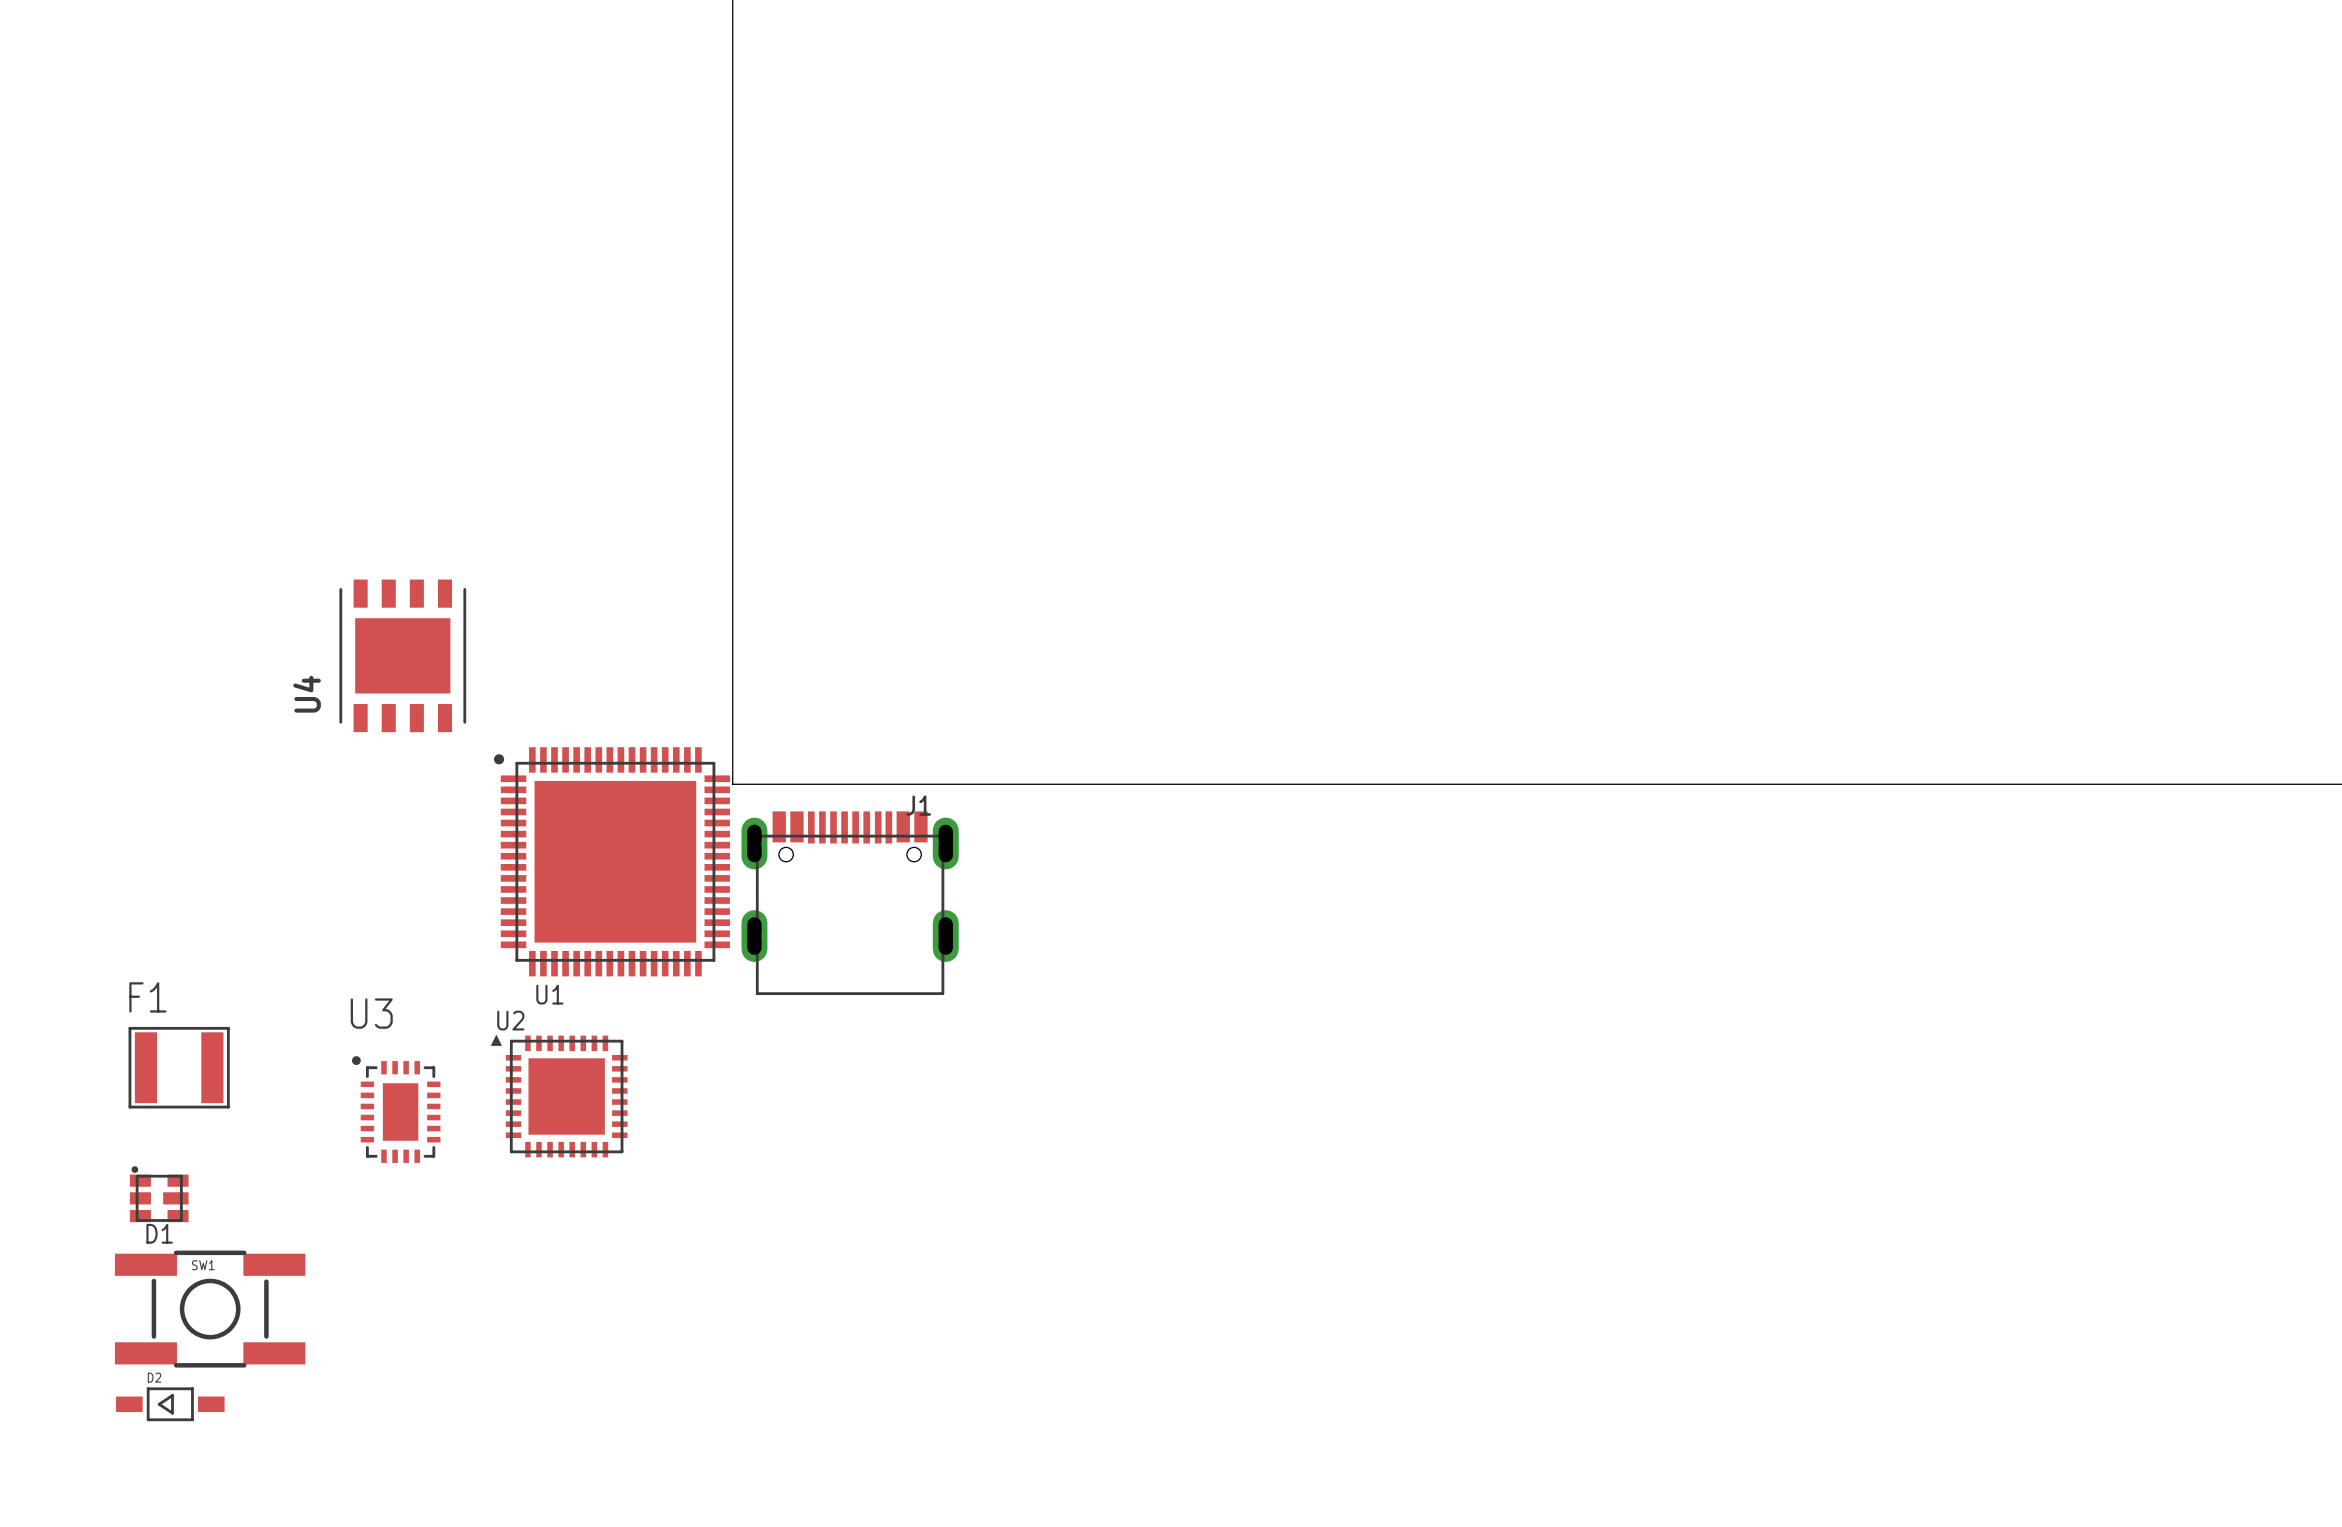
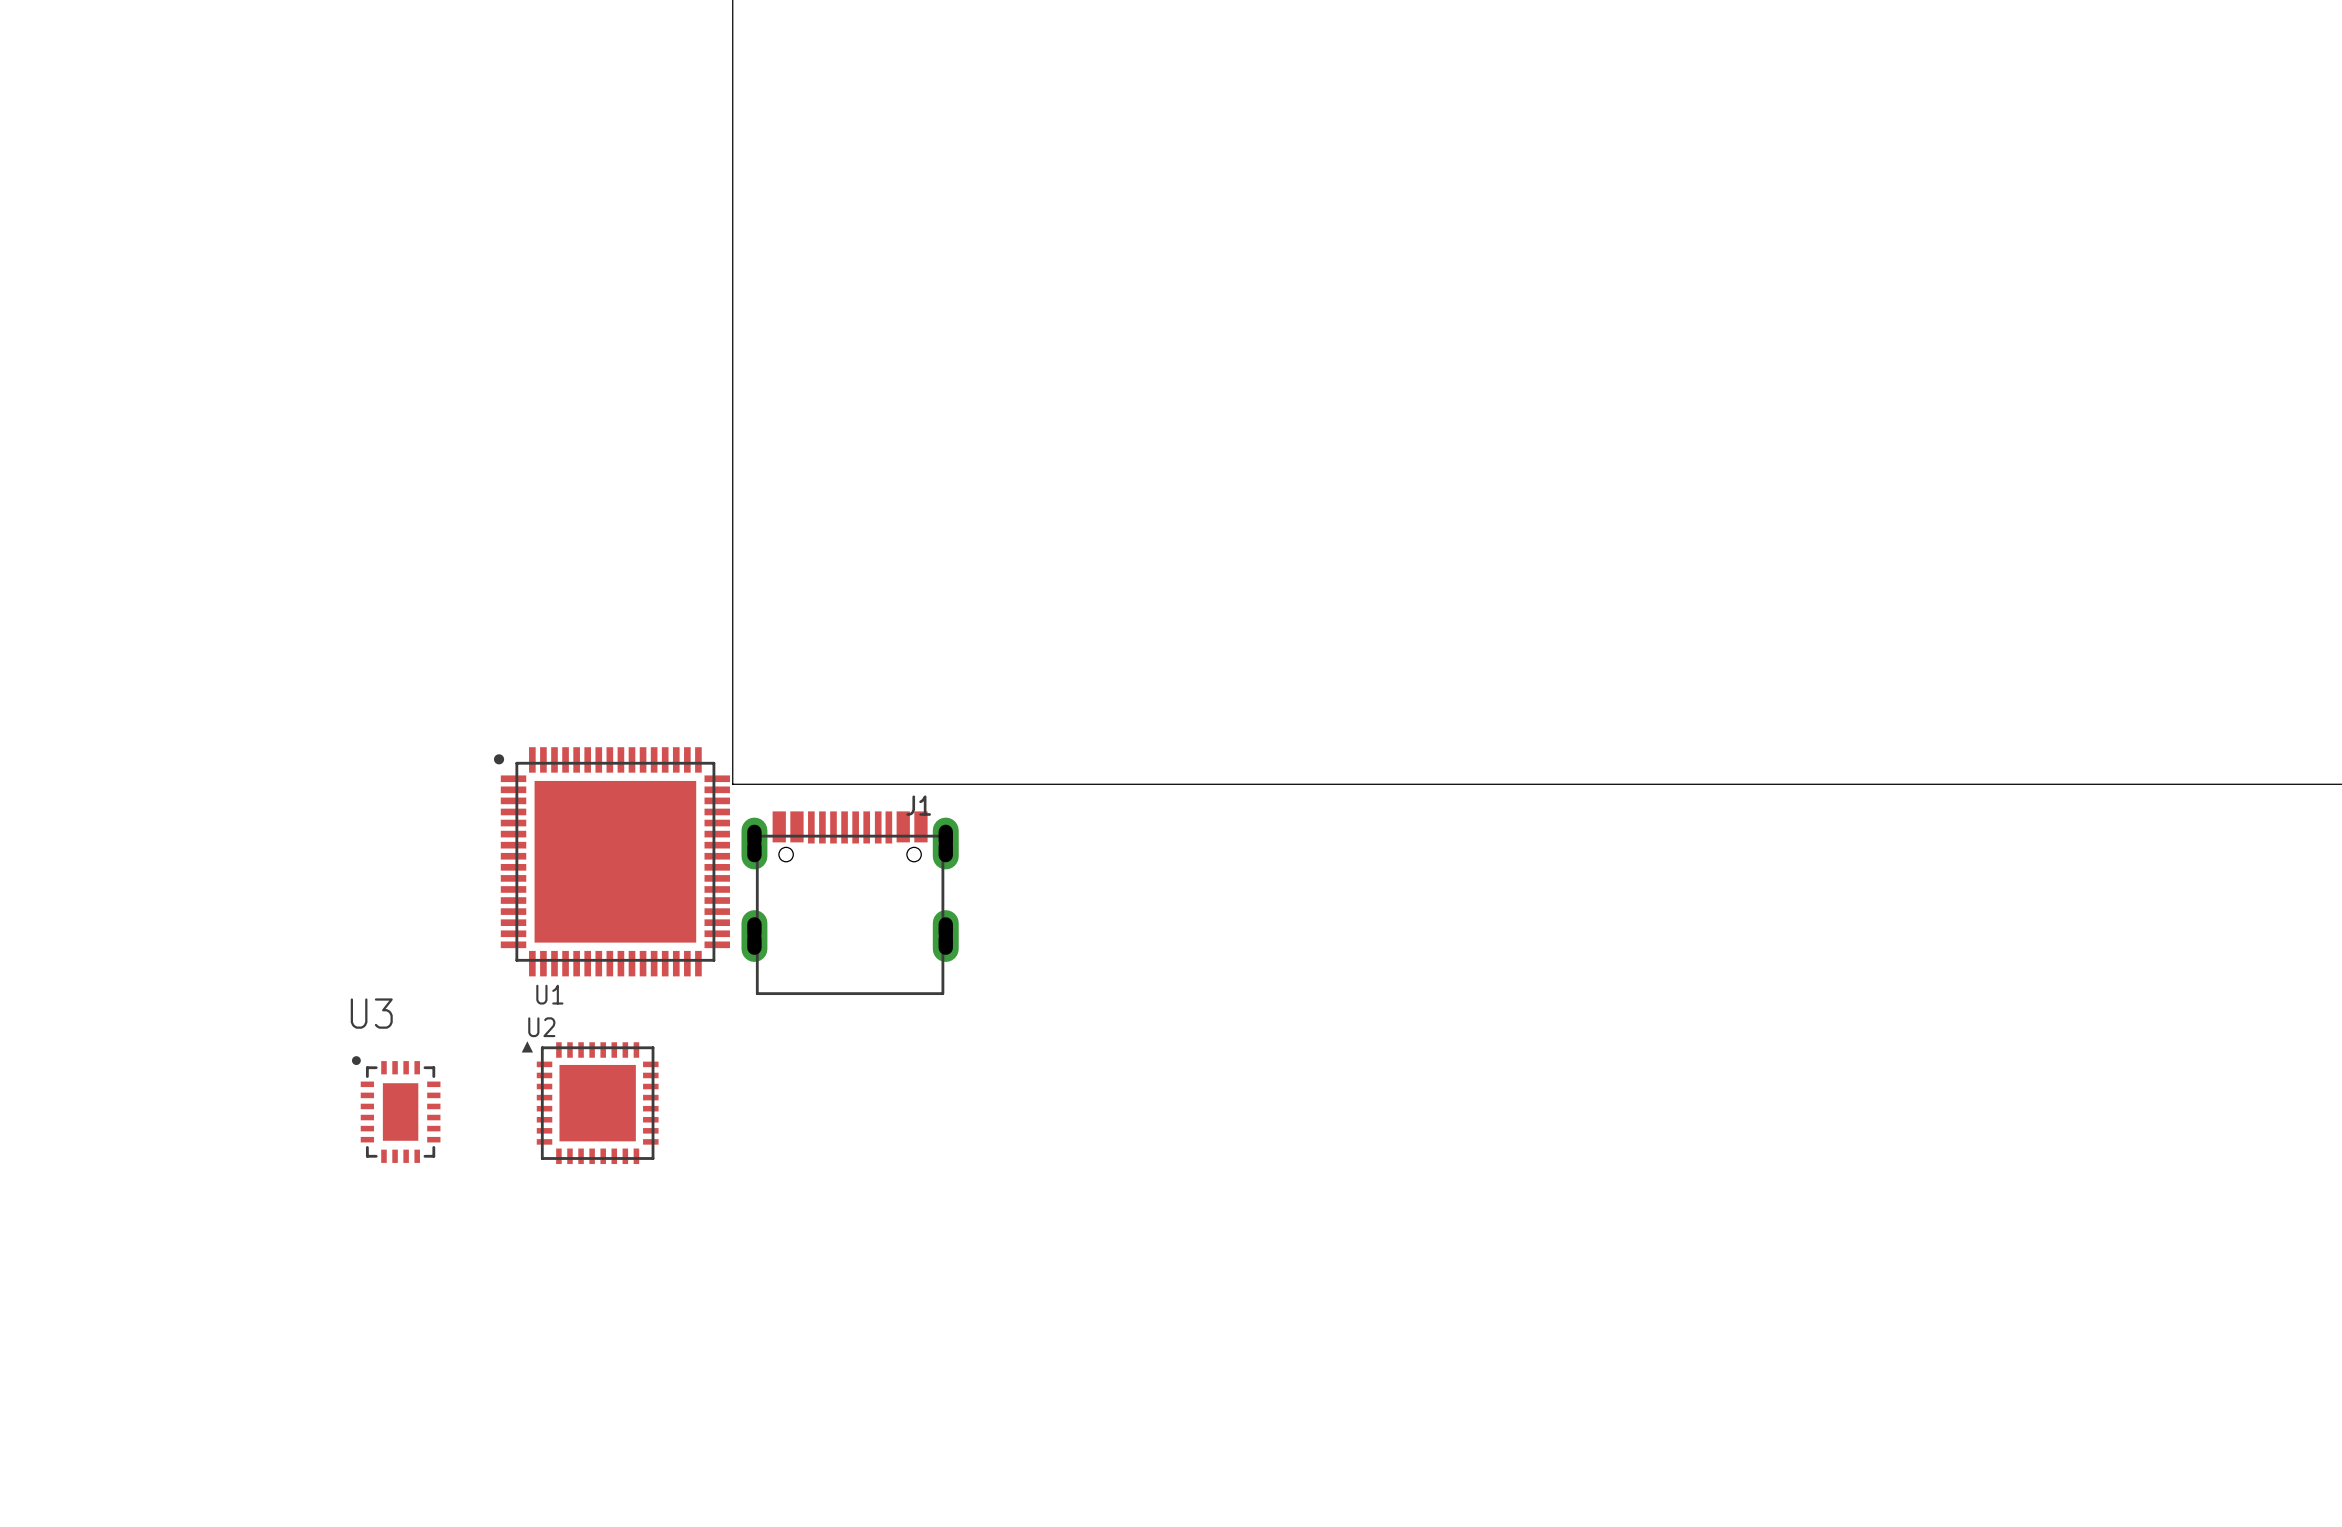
U4: (402, 655) -> none
F1: (179, 1067) -> none
U2 position: (559, 1096) -> (590, 1102)
D1: (159, 1194) -> none
SW1: (210, 1309) -> none
D2: (170, 1404) -> none

